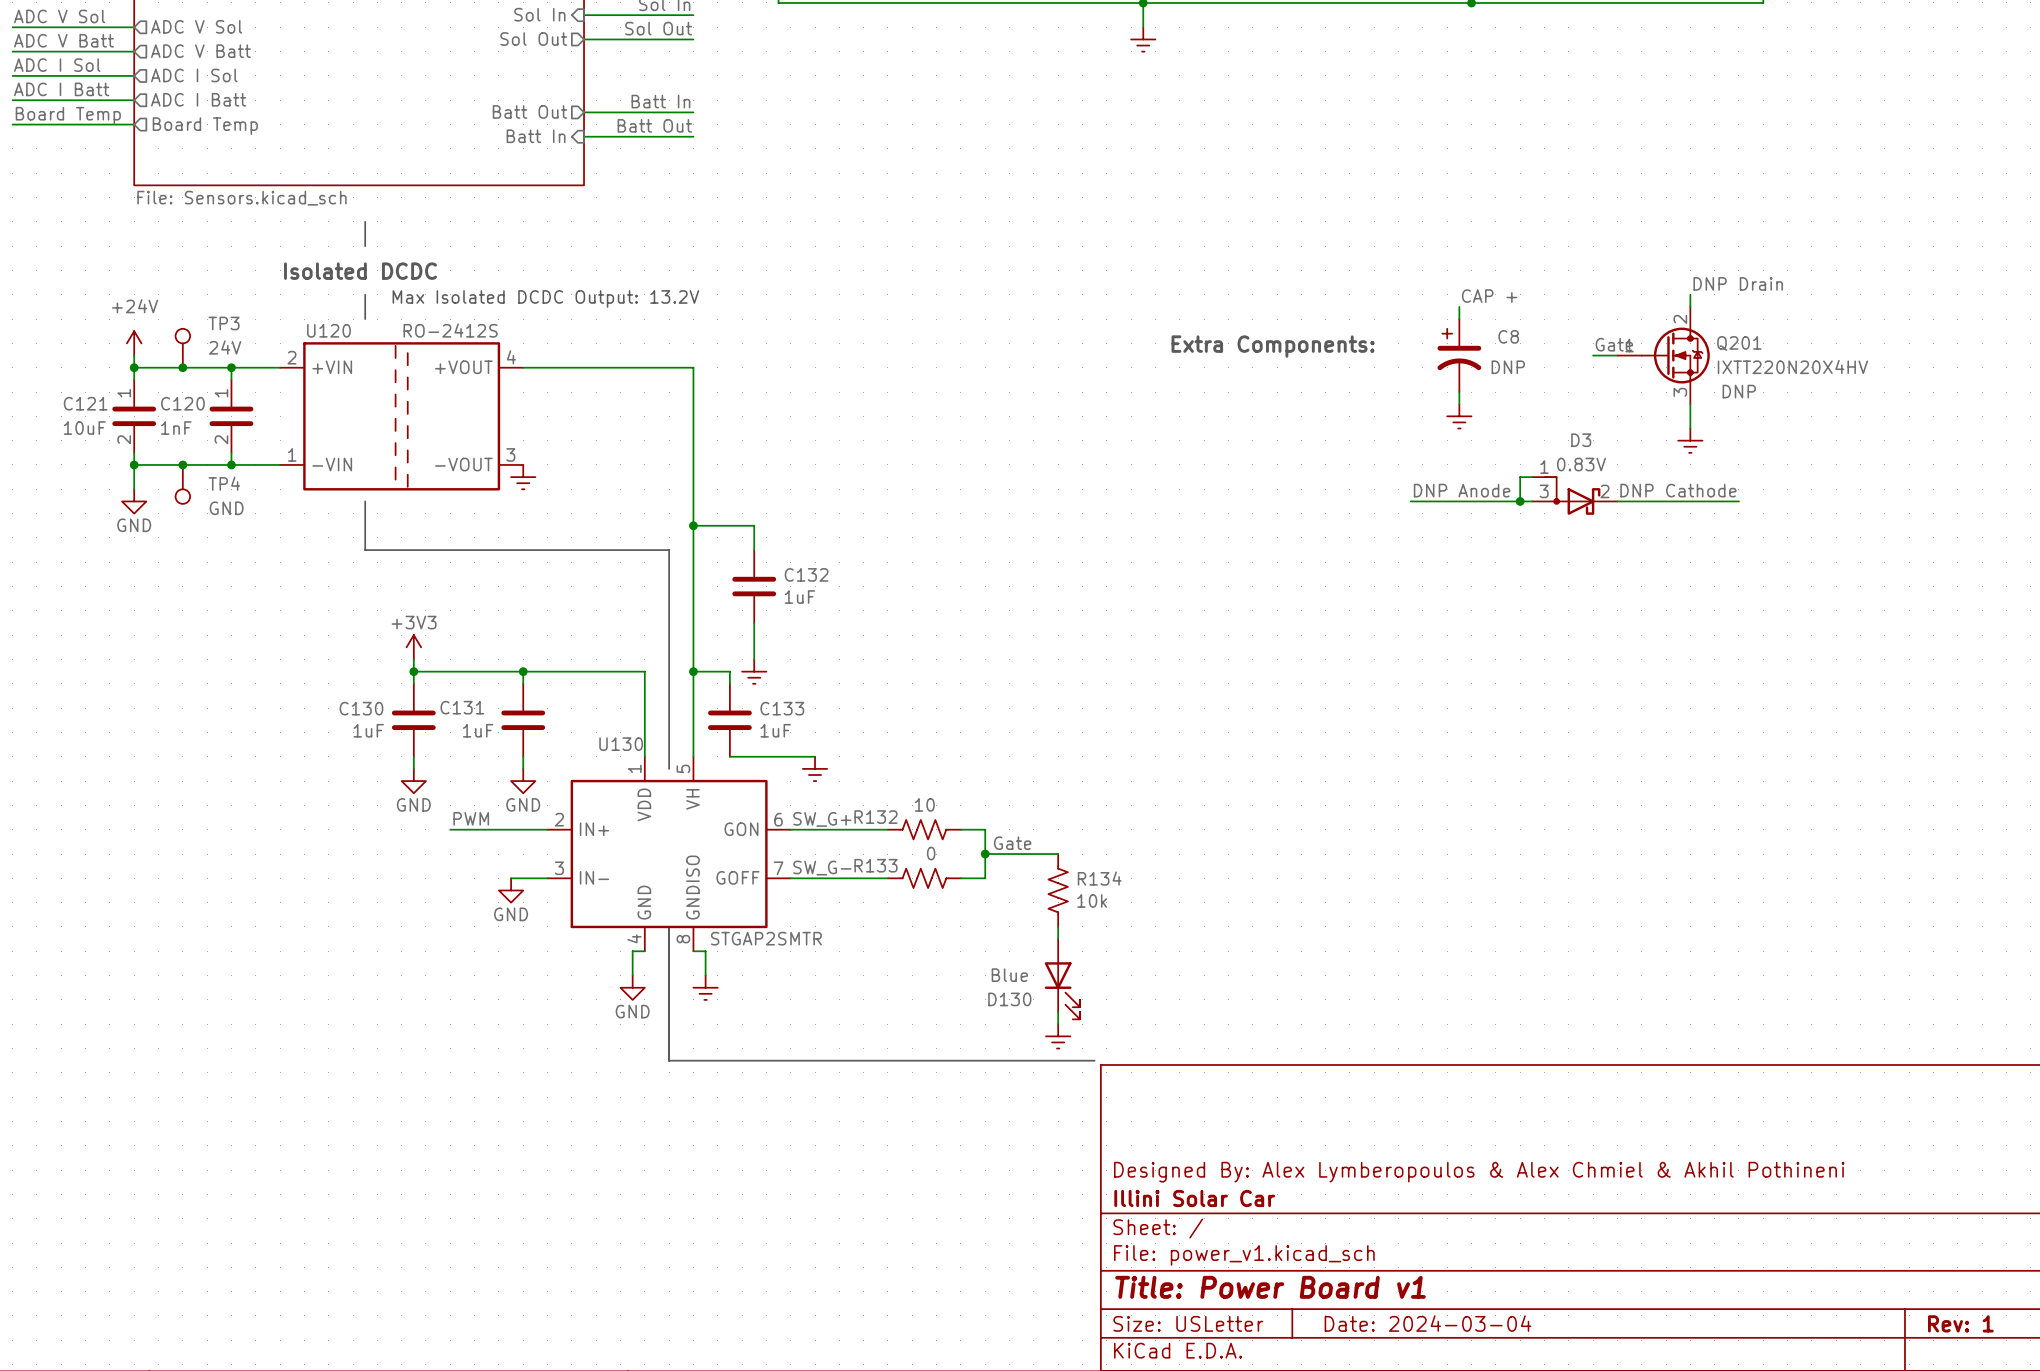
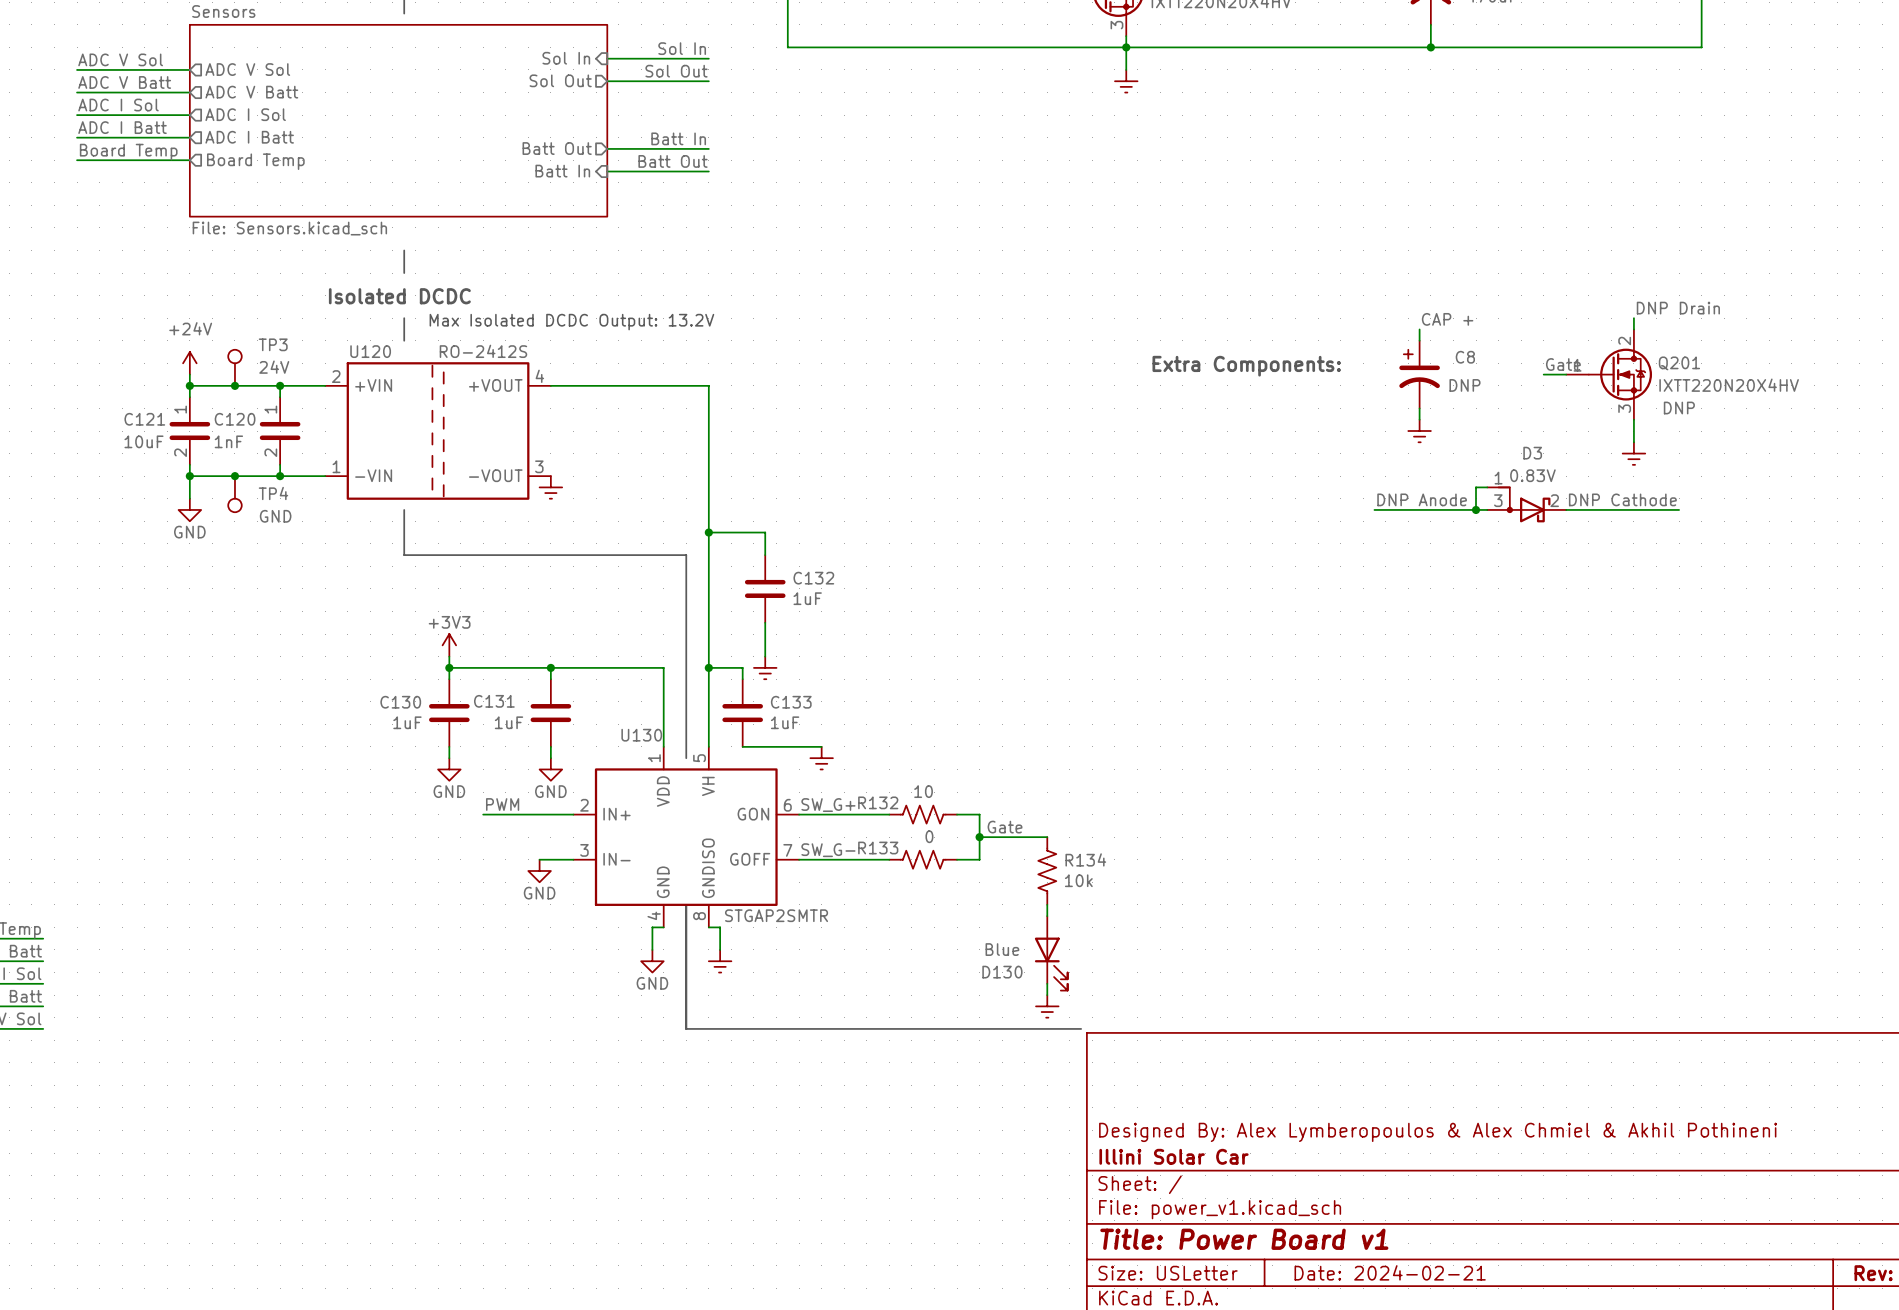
title block: Date: 2024-03-04 (1427, 1323) -> Date: 2024-02-21 (1390, 1272)

